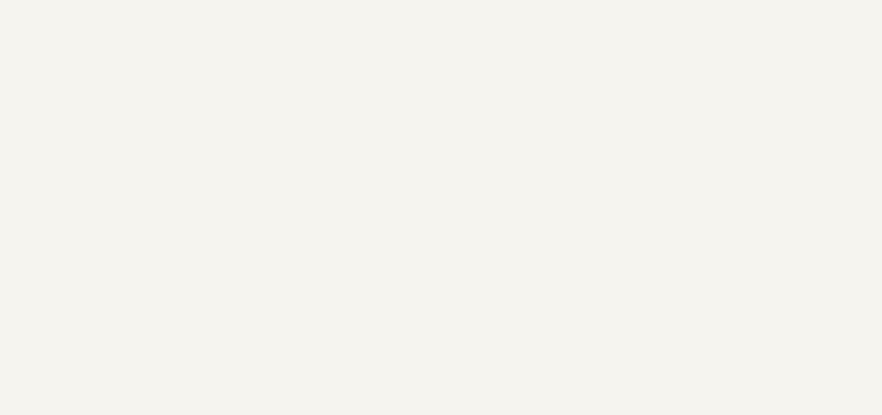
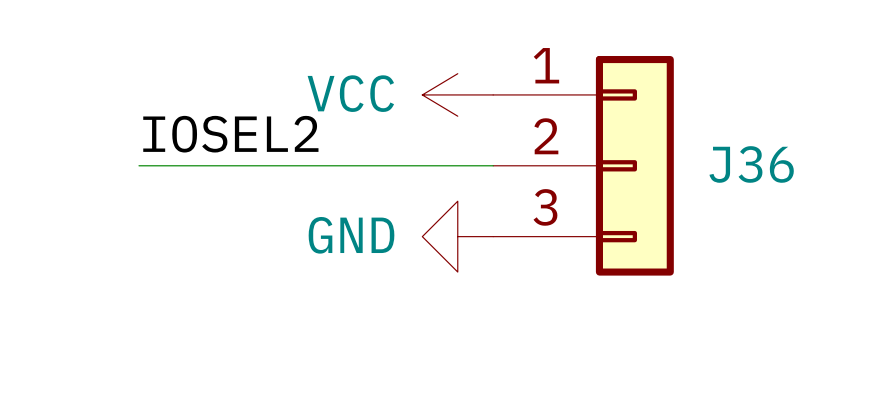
power symbol: none -> VCC (457, 94)
label: none -> IOSEL2 (230, 134)
wire: none -> (138, 165) (493, 165)
J36: none -> (583, 165)
power symbol: none -> GND (457, 236)

